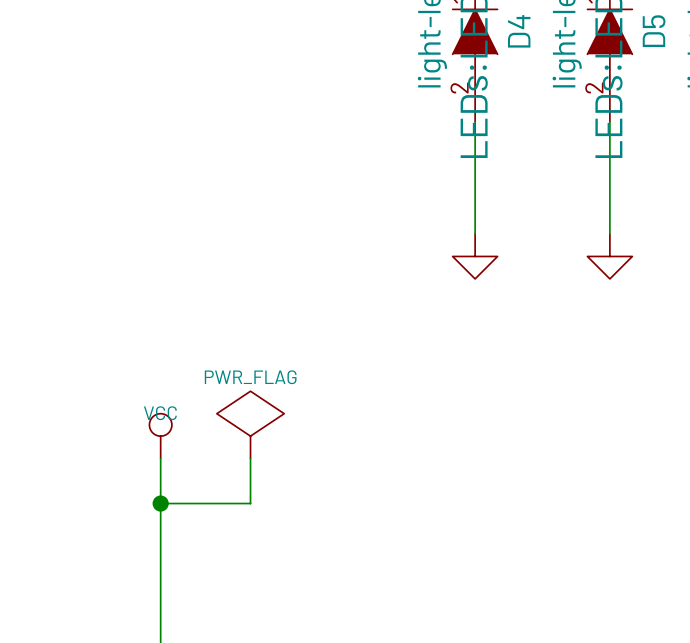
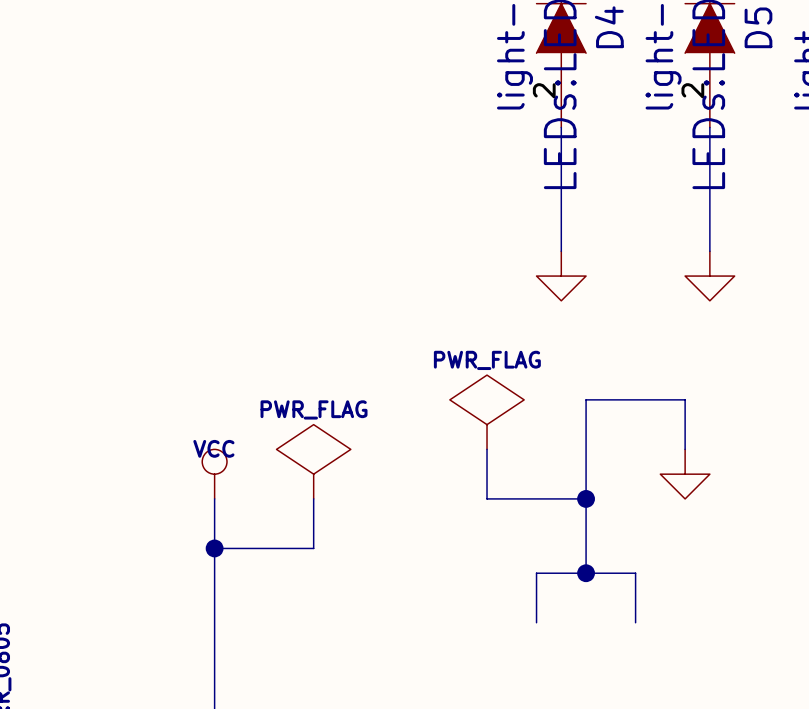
power symbol: none -> PWR_FLAG (487, 412)
wire: none -> (487, 449) (487, 498) (586, 498)
wire: none -> (685, 449) (685, 399) (586, 399) (586, 573)
power symbol: none -> (685, 474)
junction: none -> (586, 498)
junction: none -> (586, 573)
wire: none -> (536, 622) (536, 573) (635, 573) (635, 622)

